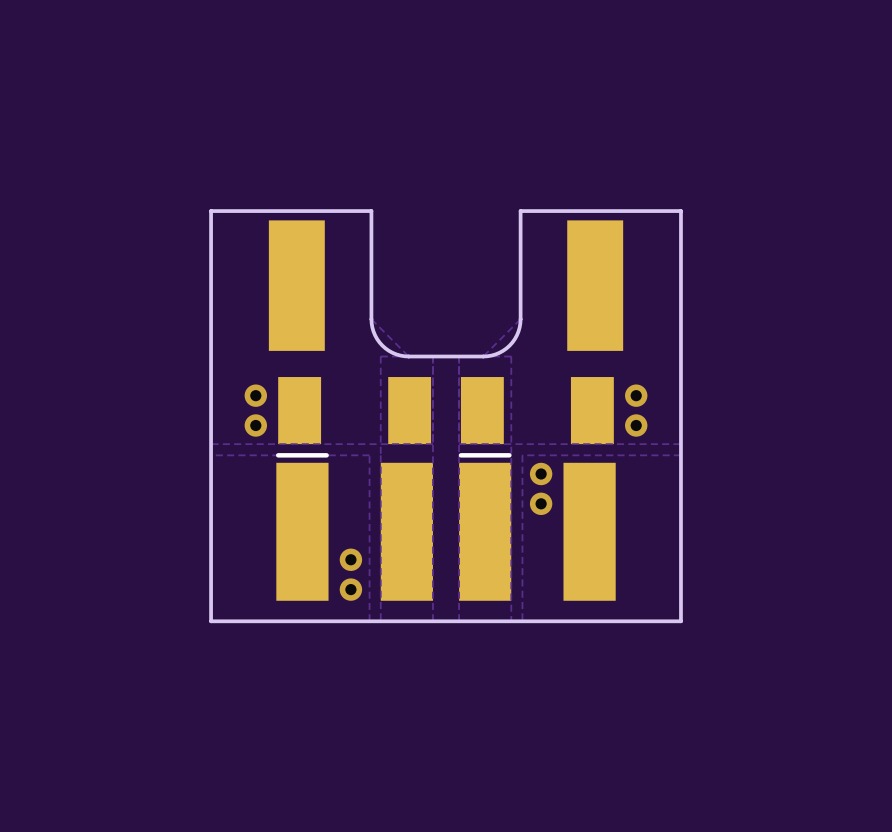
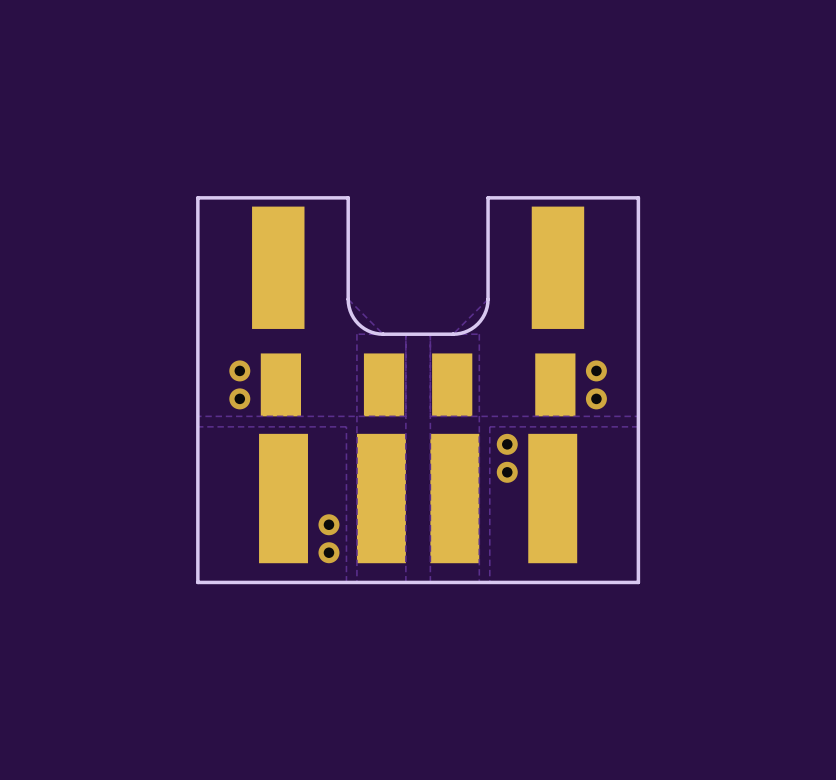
part footprint: [275, 453, 433, 601] -> [259, 433, 406, 564]
part footprint: [458, 453, 616, 601] -> [430, 433, 578, 564]

